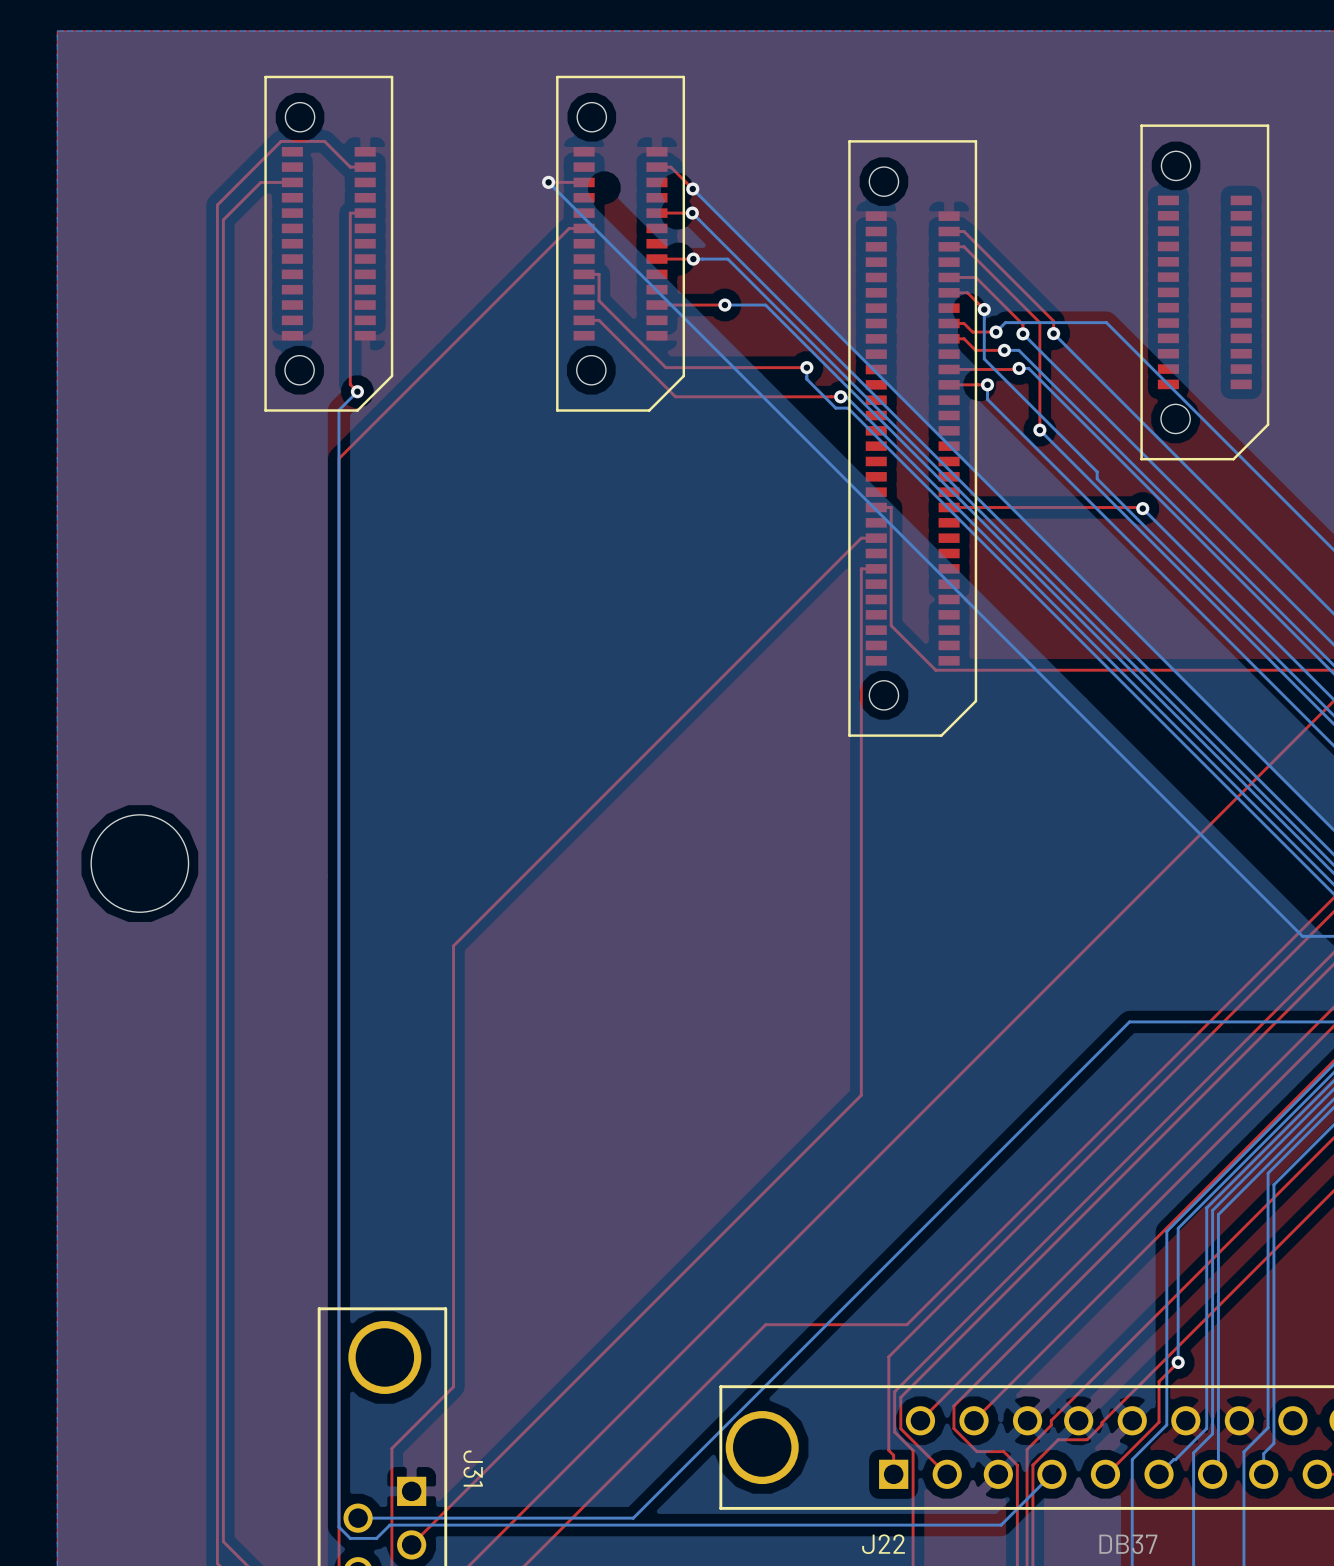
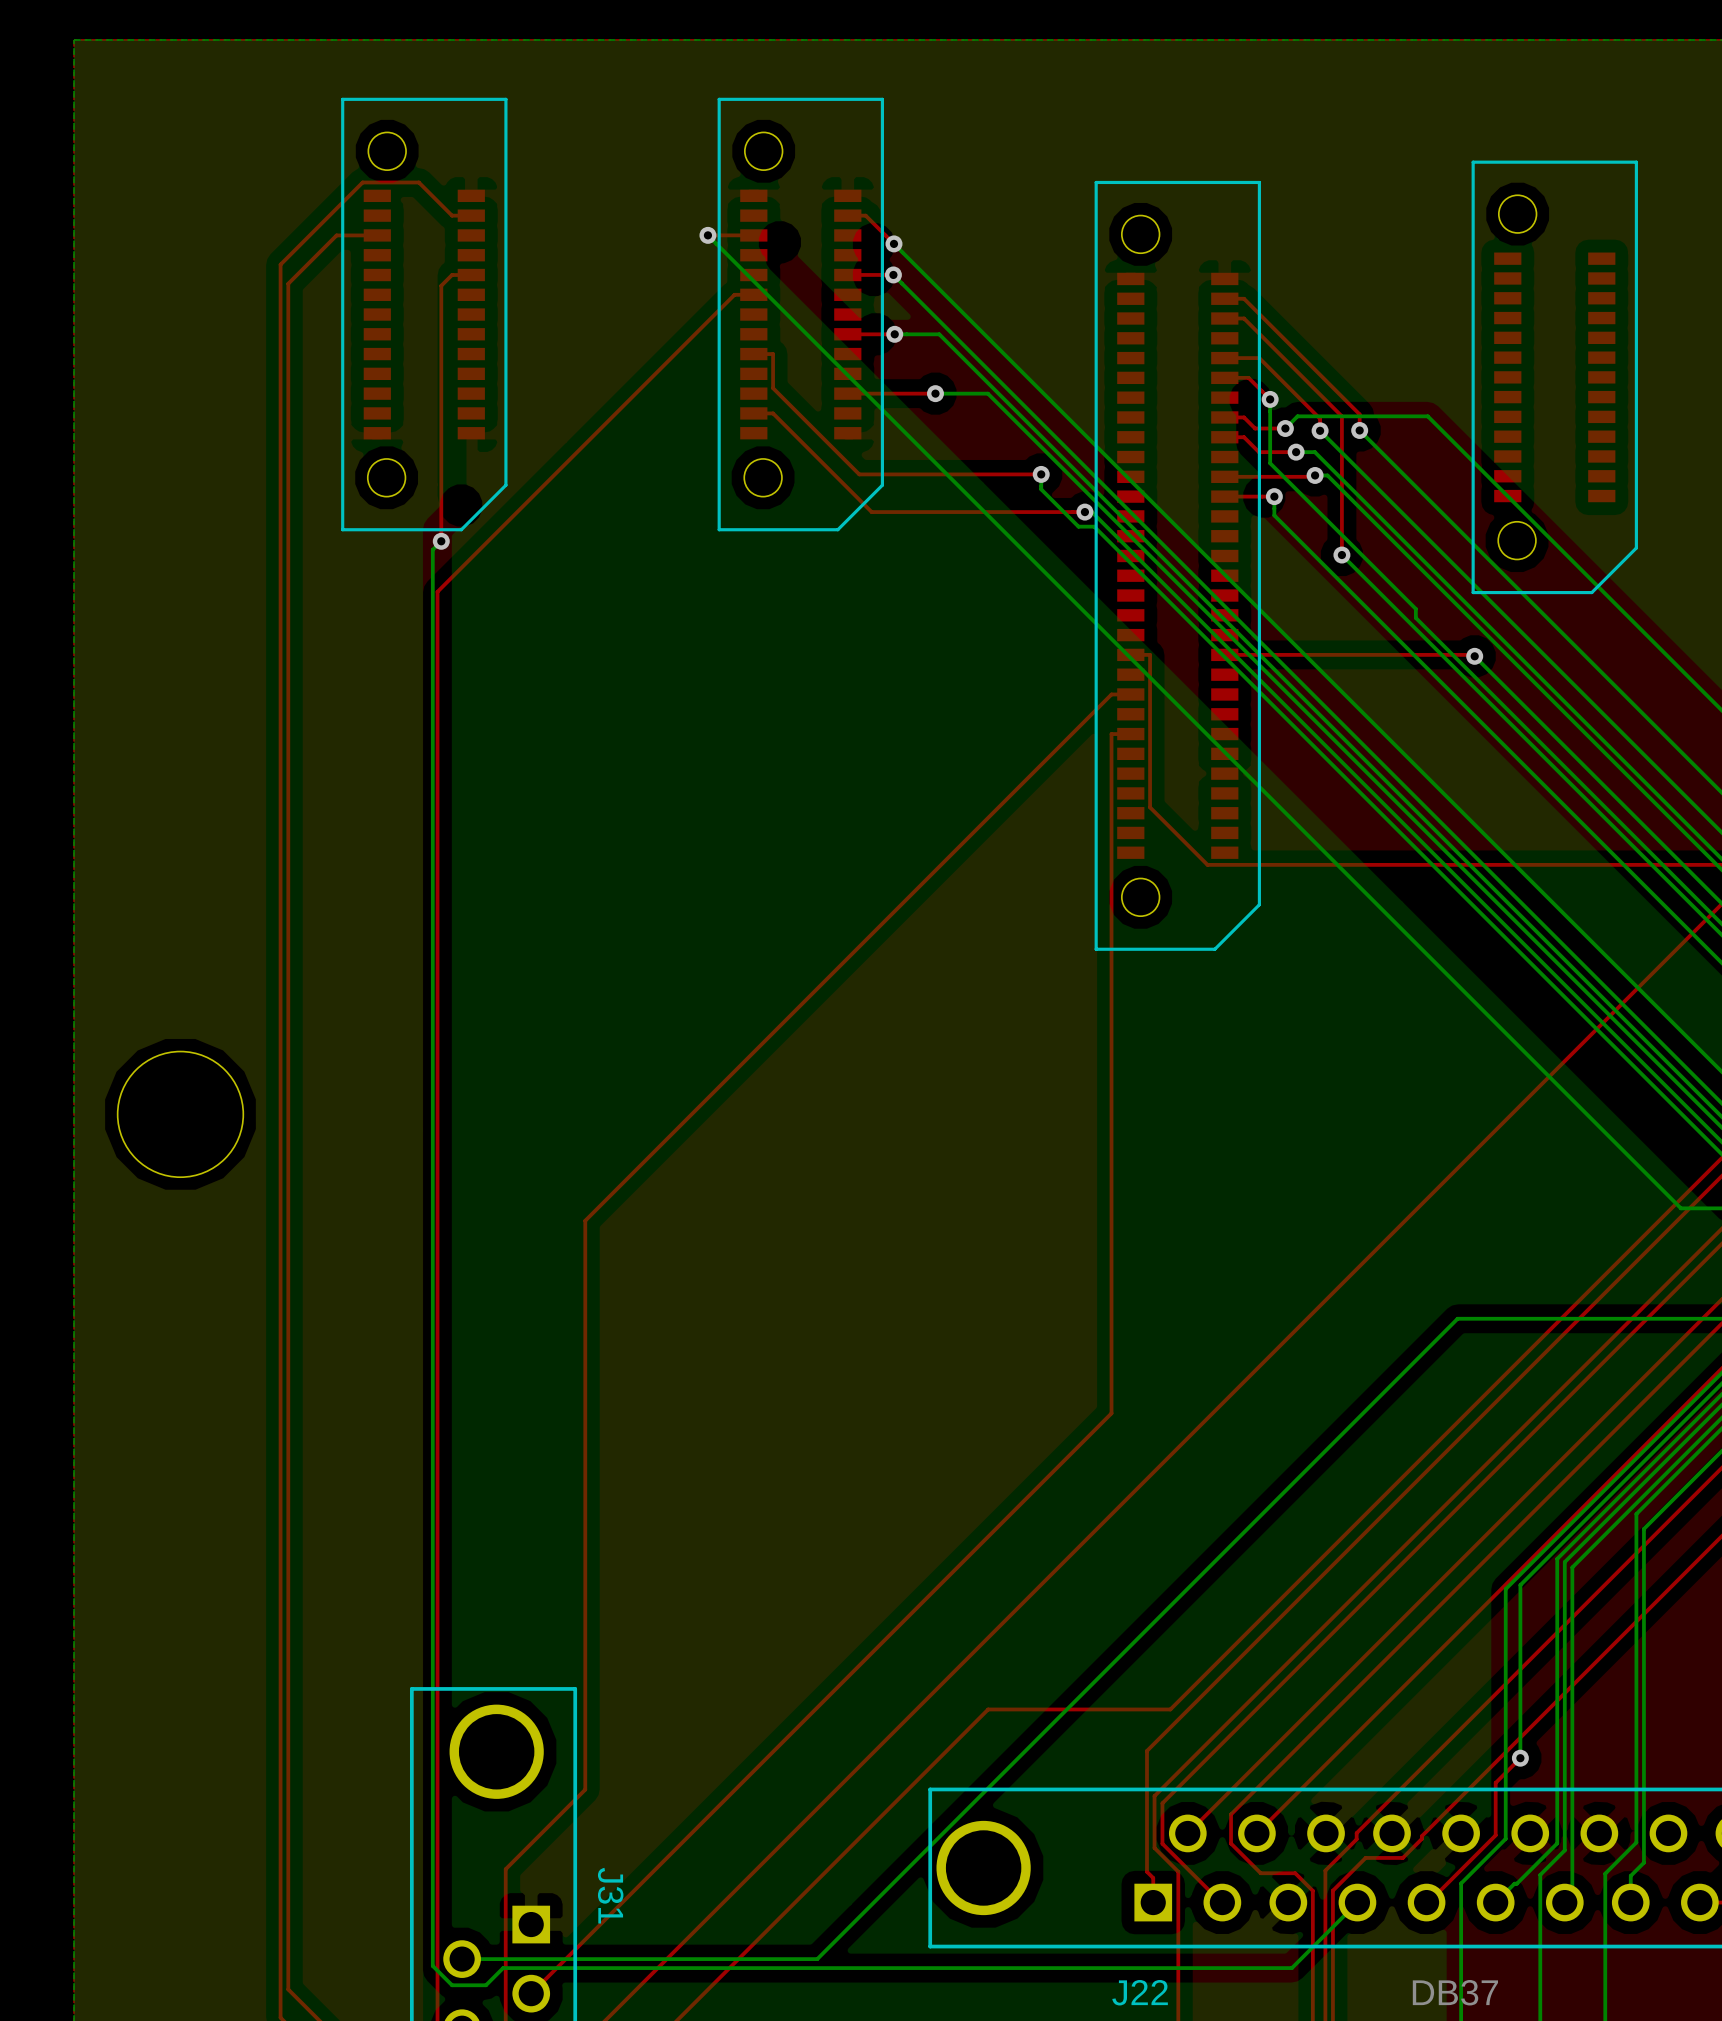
top track: (350, 213) (350, 384) (357, 391) -> (452, 275) (441, 285) (441, 541)
bottom track: (357, 391) (338, 410) (338, 1527) -> (441, 541) (432, 549) (432, 1965) (437, 1970)
via position: (357, 391) -> (441, 541)

